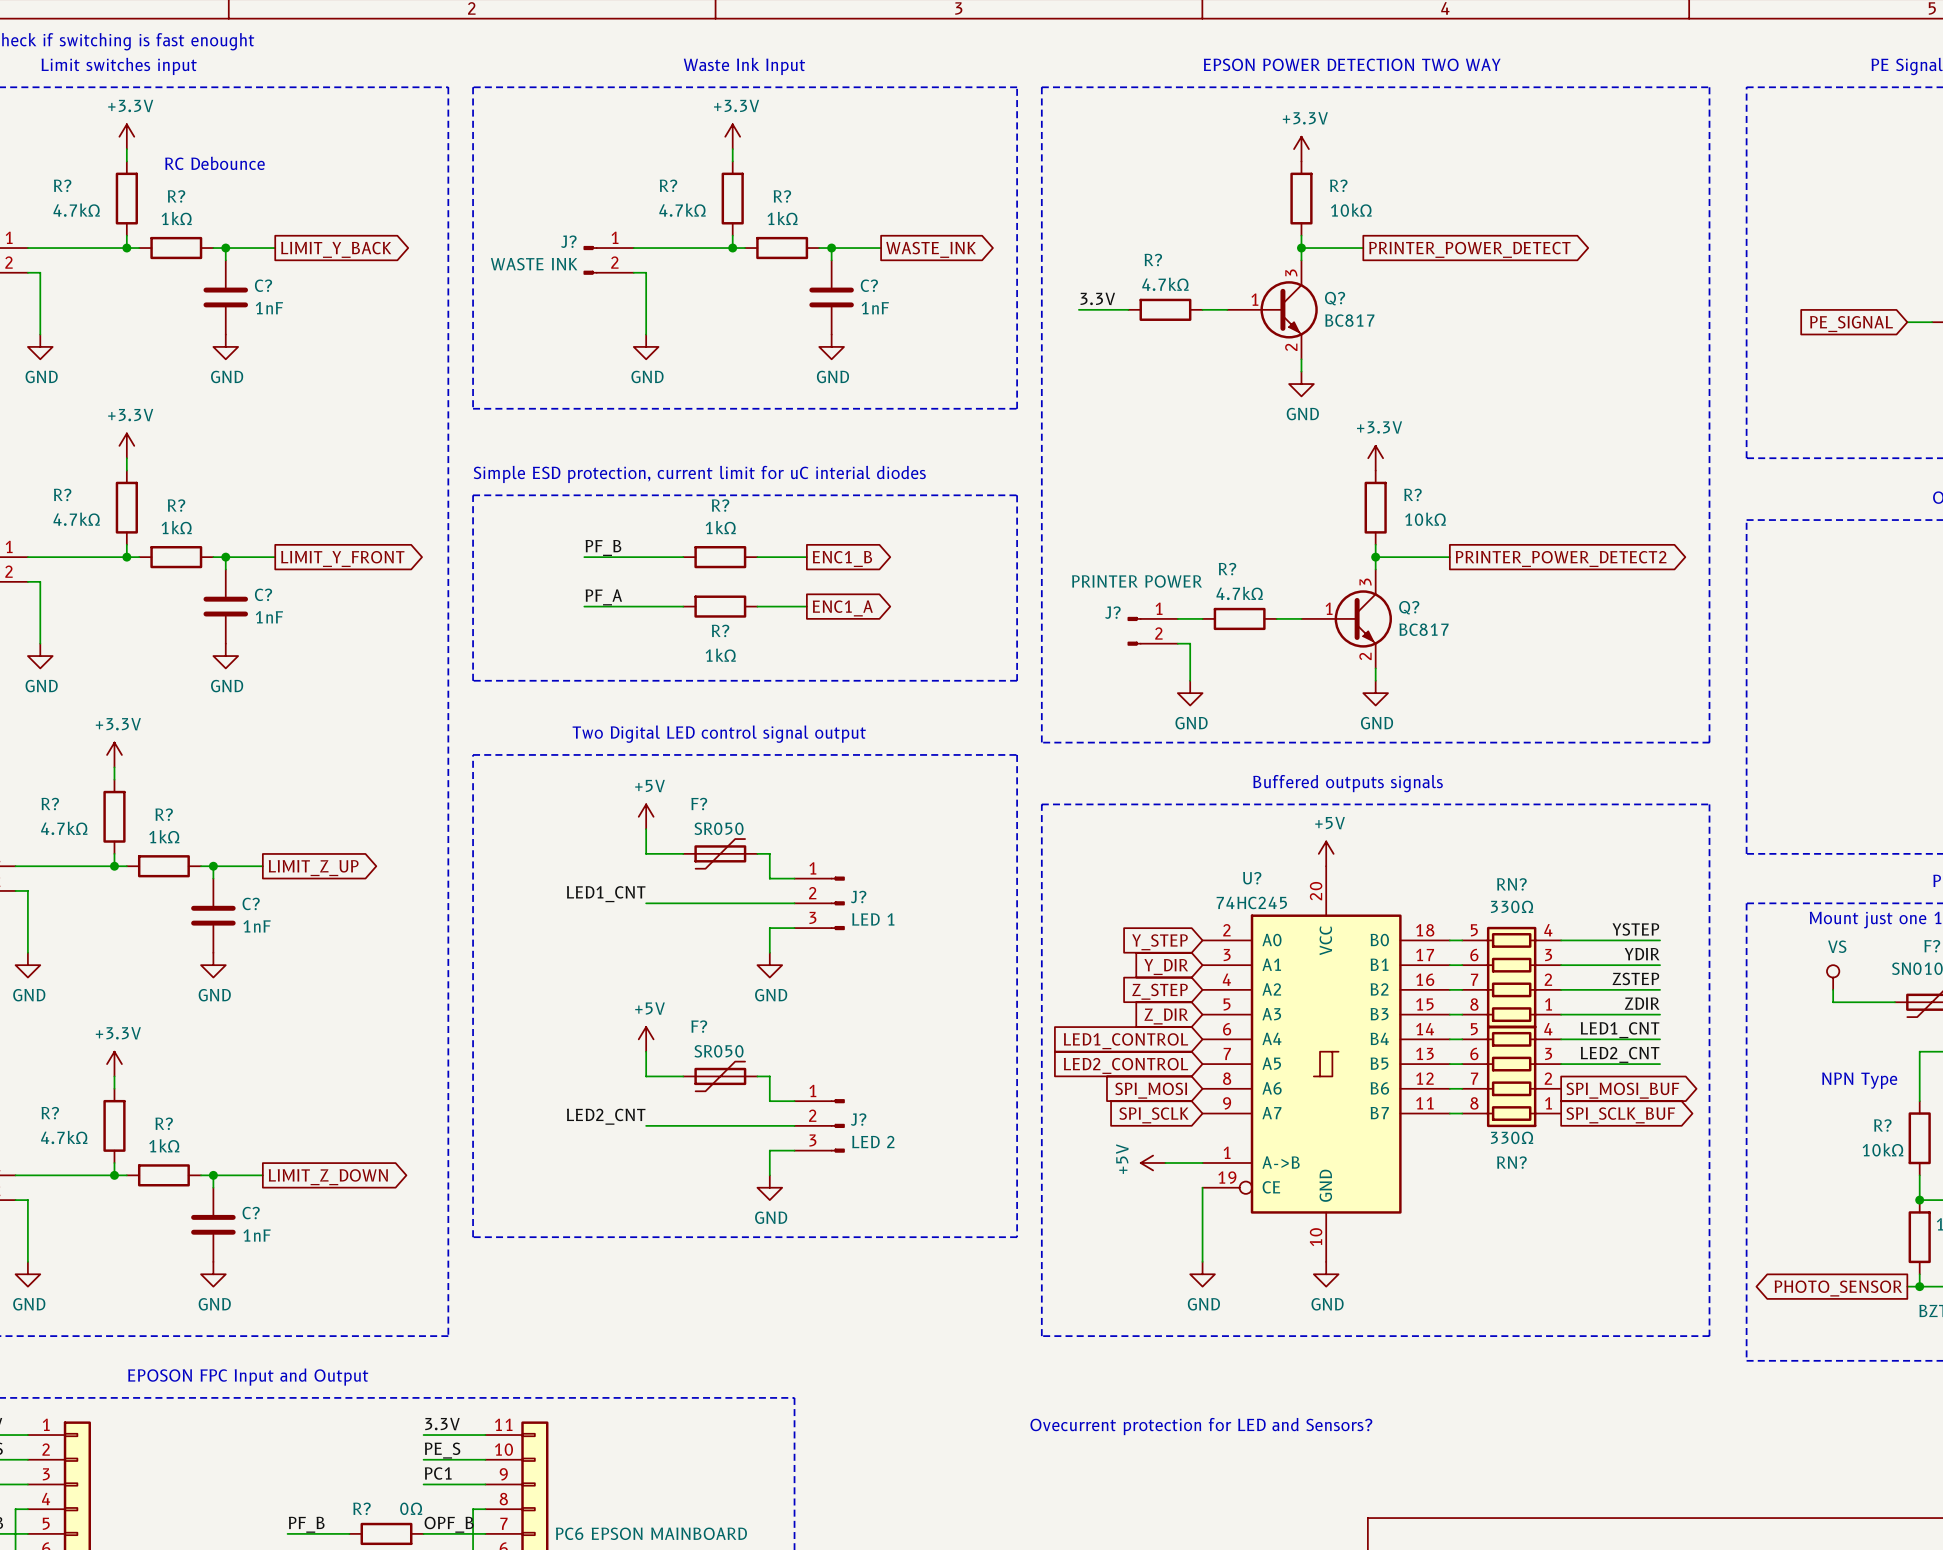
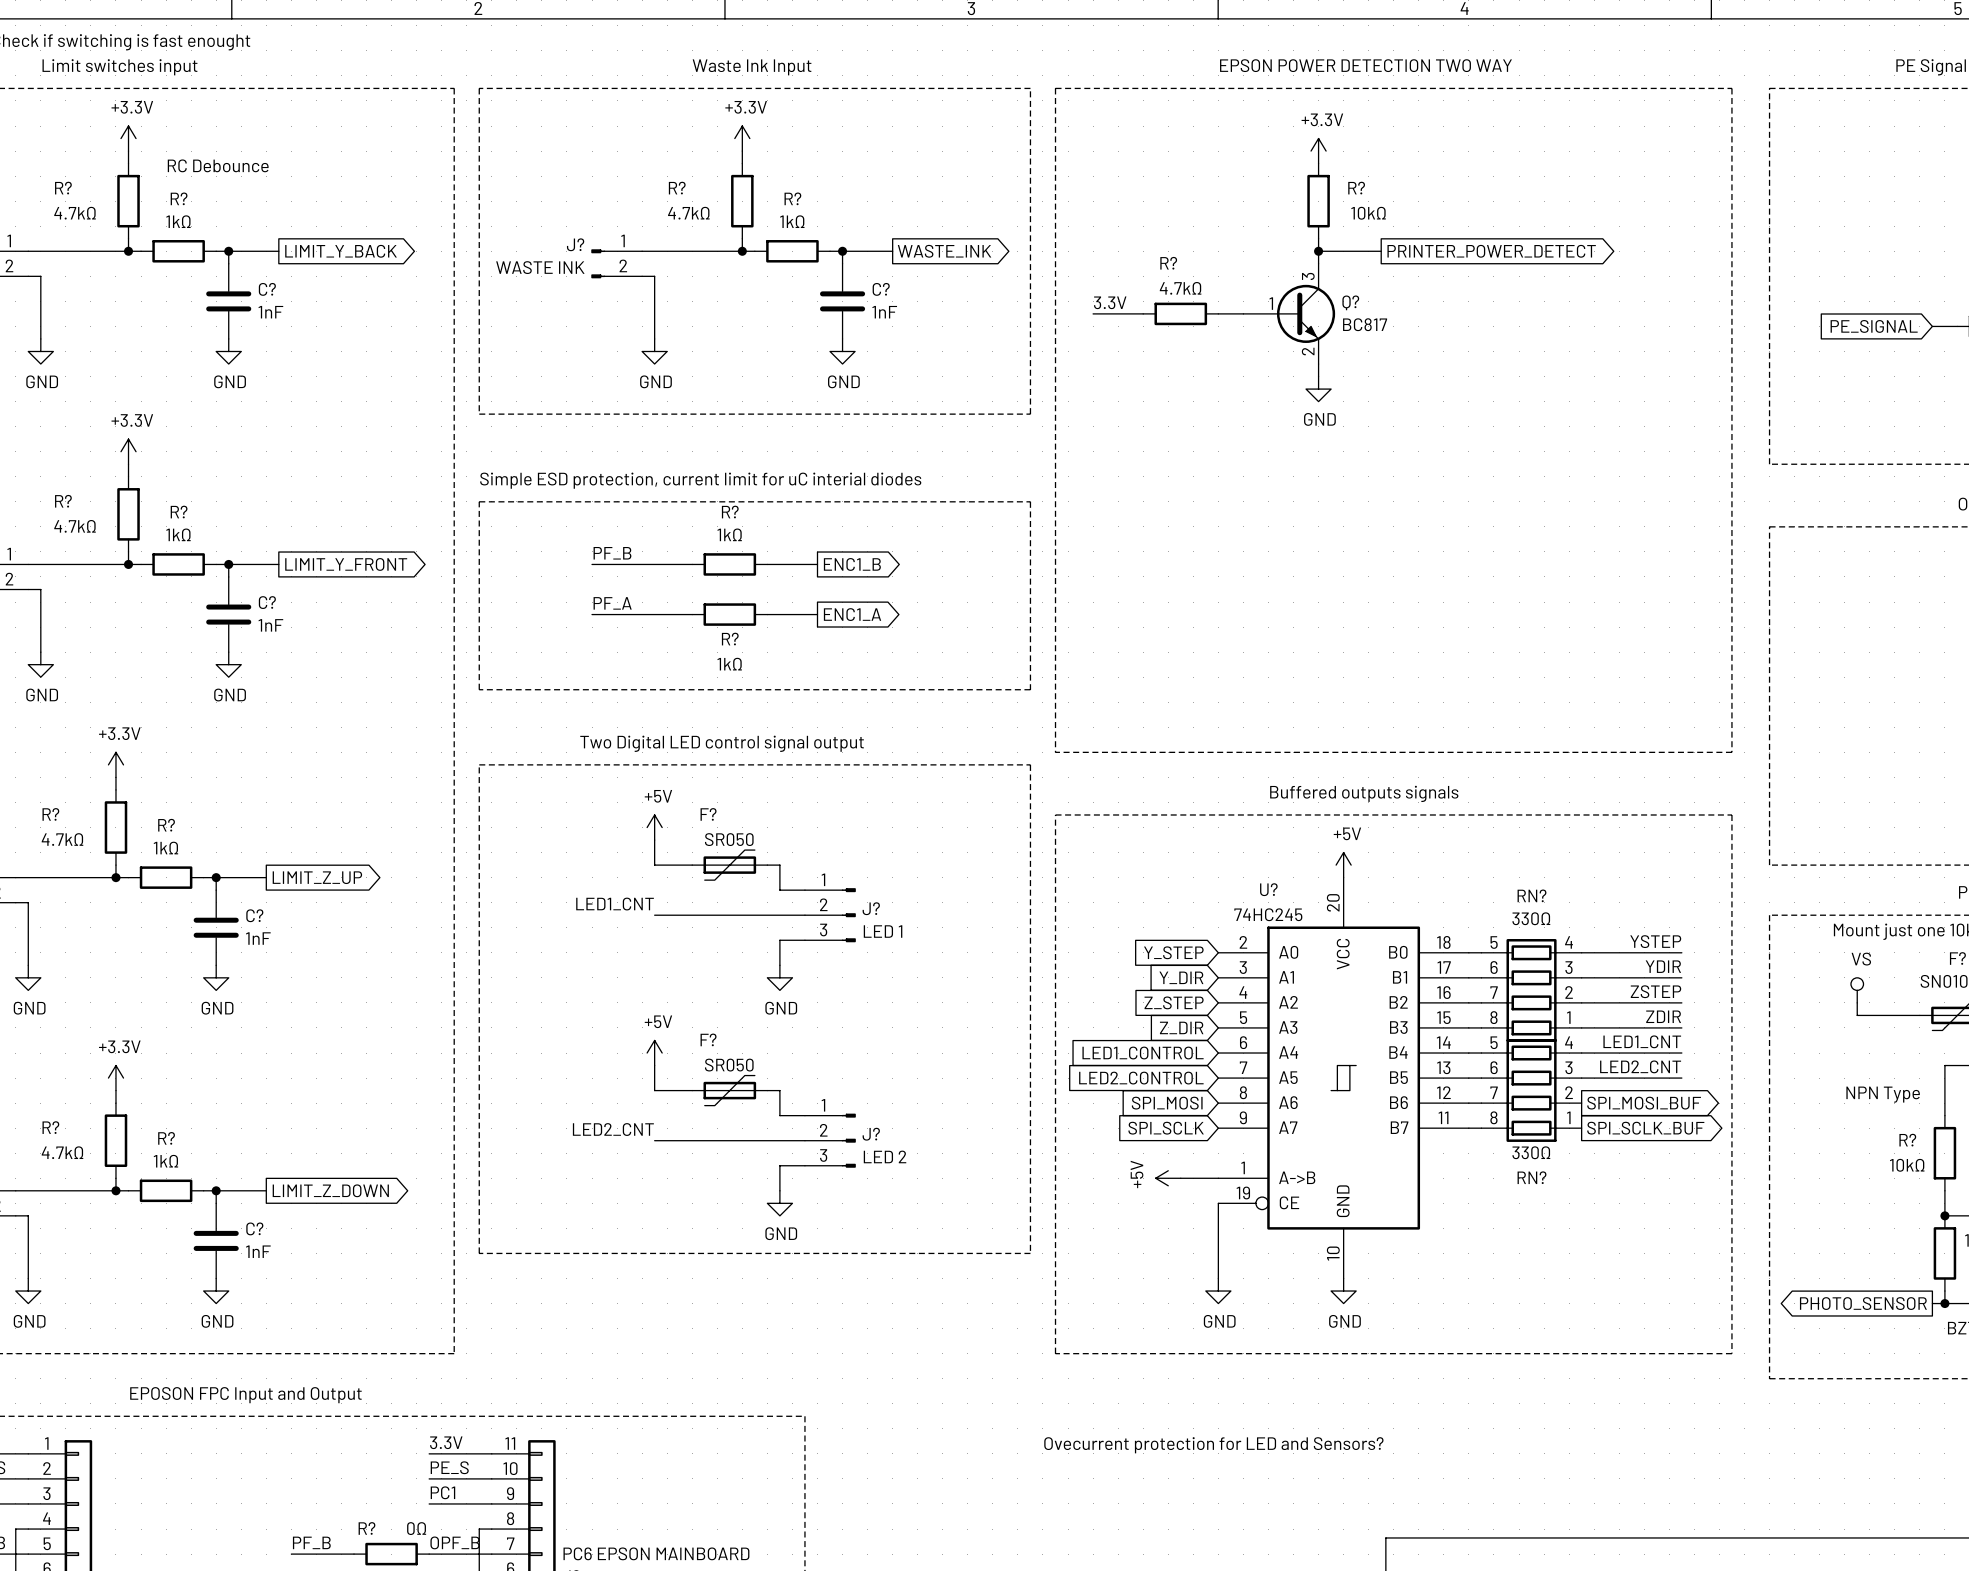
power symbol: +3.3V (1375, 458) -> none
R?: 10kΩ (1375, 507) -> none
wire: (1375, 544) (1375, 569) -> none
wire: (1375, 557) (1449, 557) -> none
junction: (1375, 557) -> none
global label: PRINTER_POWER_DETECT2 (1561, 558) -> none
wire: (1177, 618) (1202, 618) -> none
R?: 4.7kΩ (1239, 618) -> none
wire: (1276, 618) (1301, 618) -> none
Q?: BC817 (1346, 618) -> none
J?: PRINTER POWER (1152, 631) -> none
wire: (1177, 643) (1190, 643) (1190, 680) -> none
wire: (1375, 668) (1375, 680) -> none
power symbol: GND (1190, 693) -> none
power symbol: GND (1375, 693) -> none

